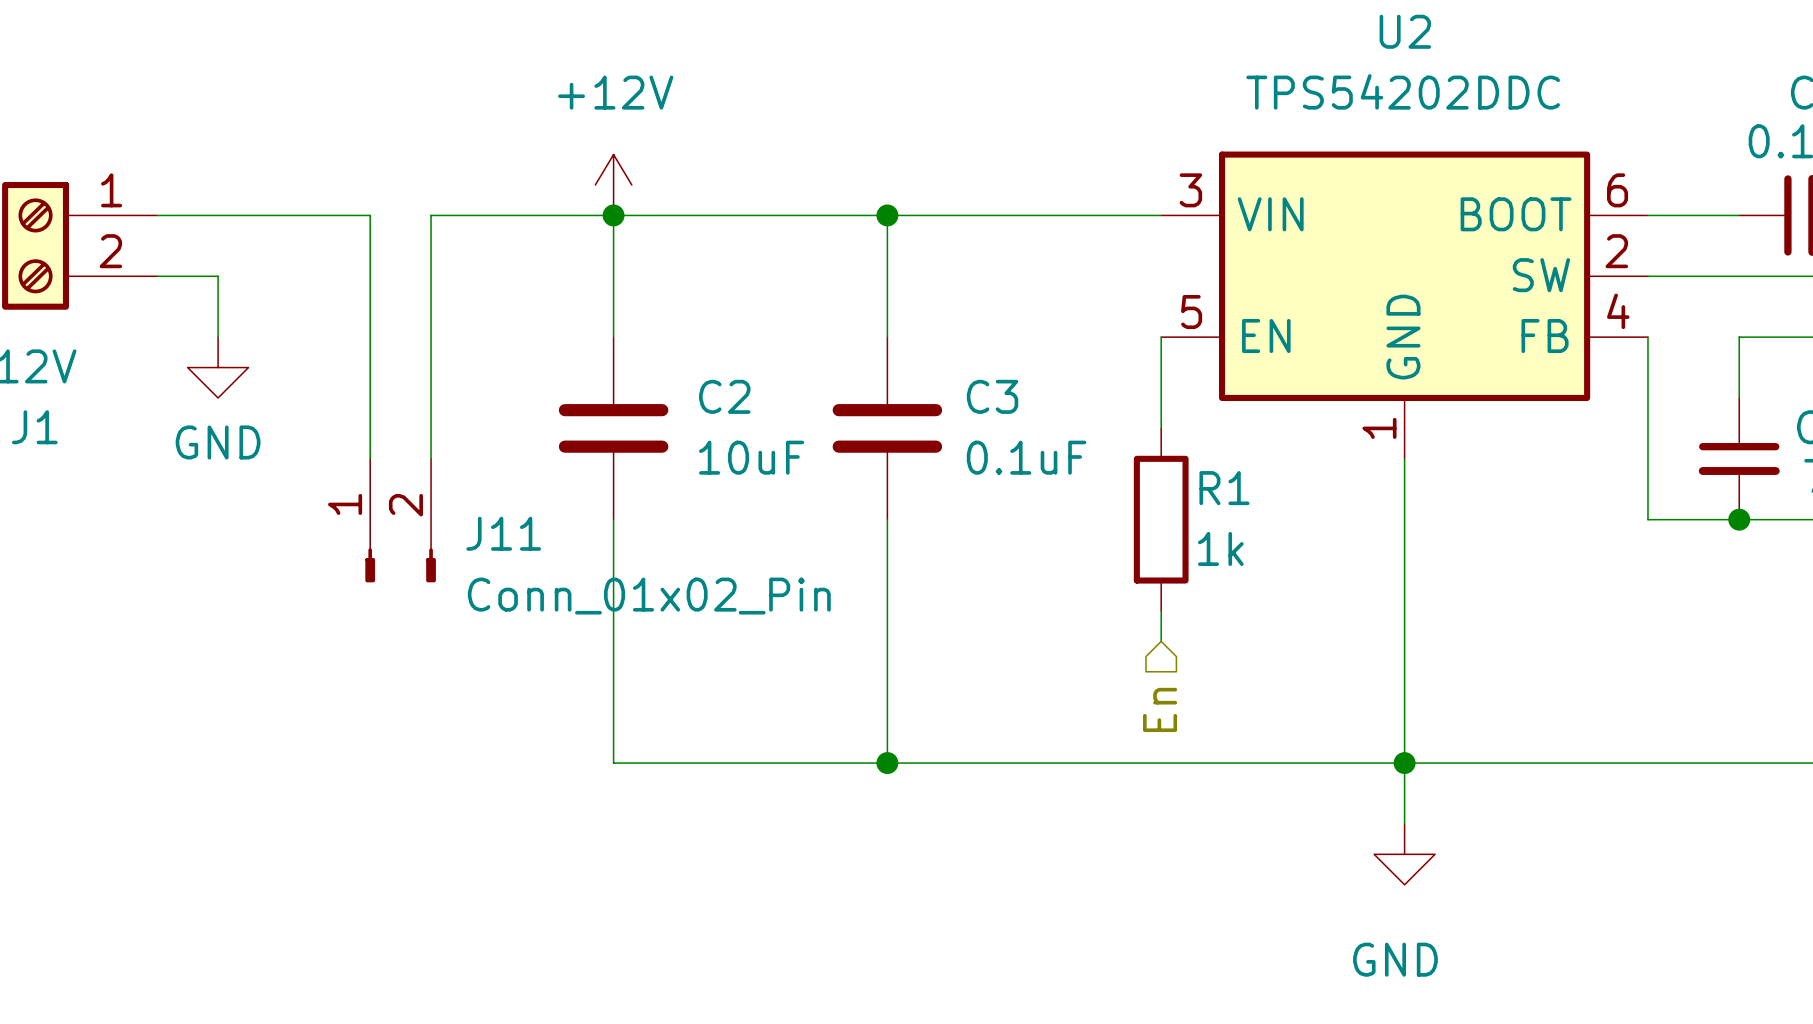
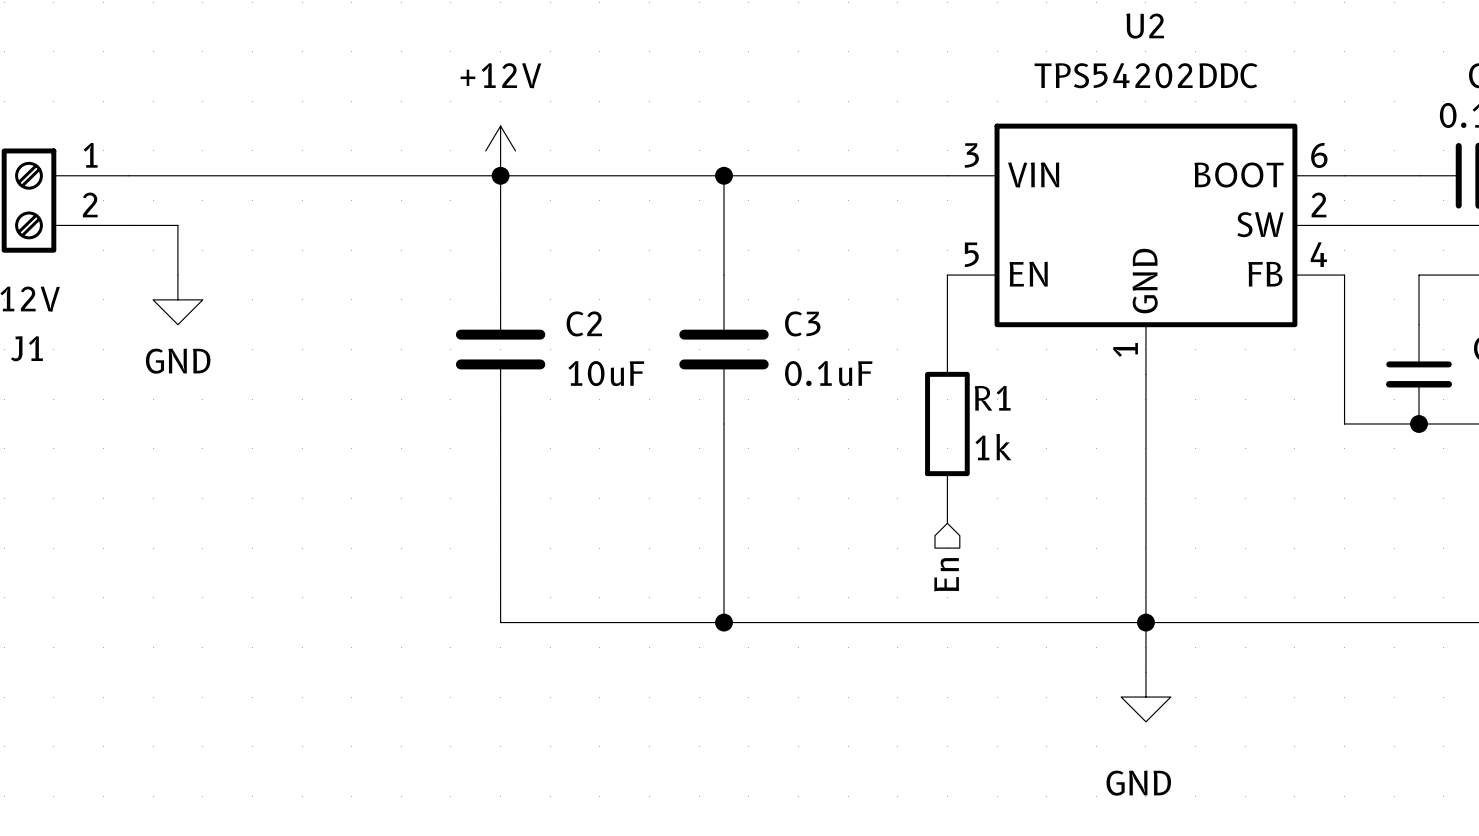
wire: (370, 215) (370, 458) -> (302, 175) (351, 175)
wire: (431, 215) (431, 458) -> none
J11: Conn_01x02_Pin (400, 520) -> none

